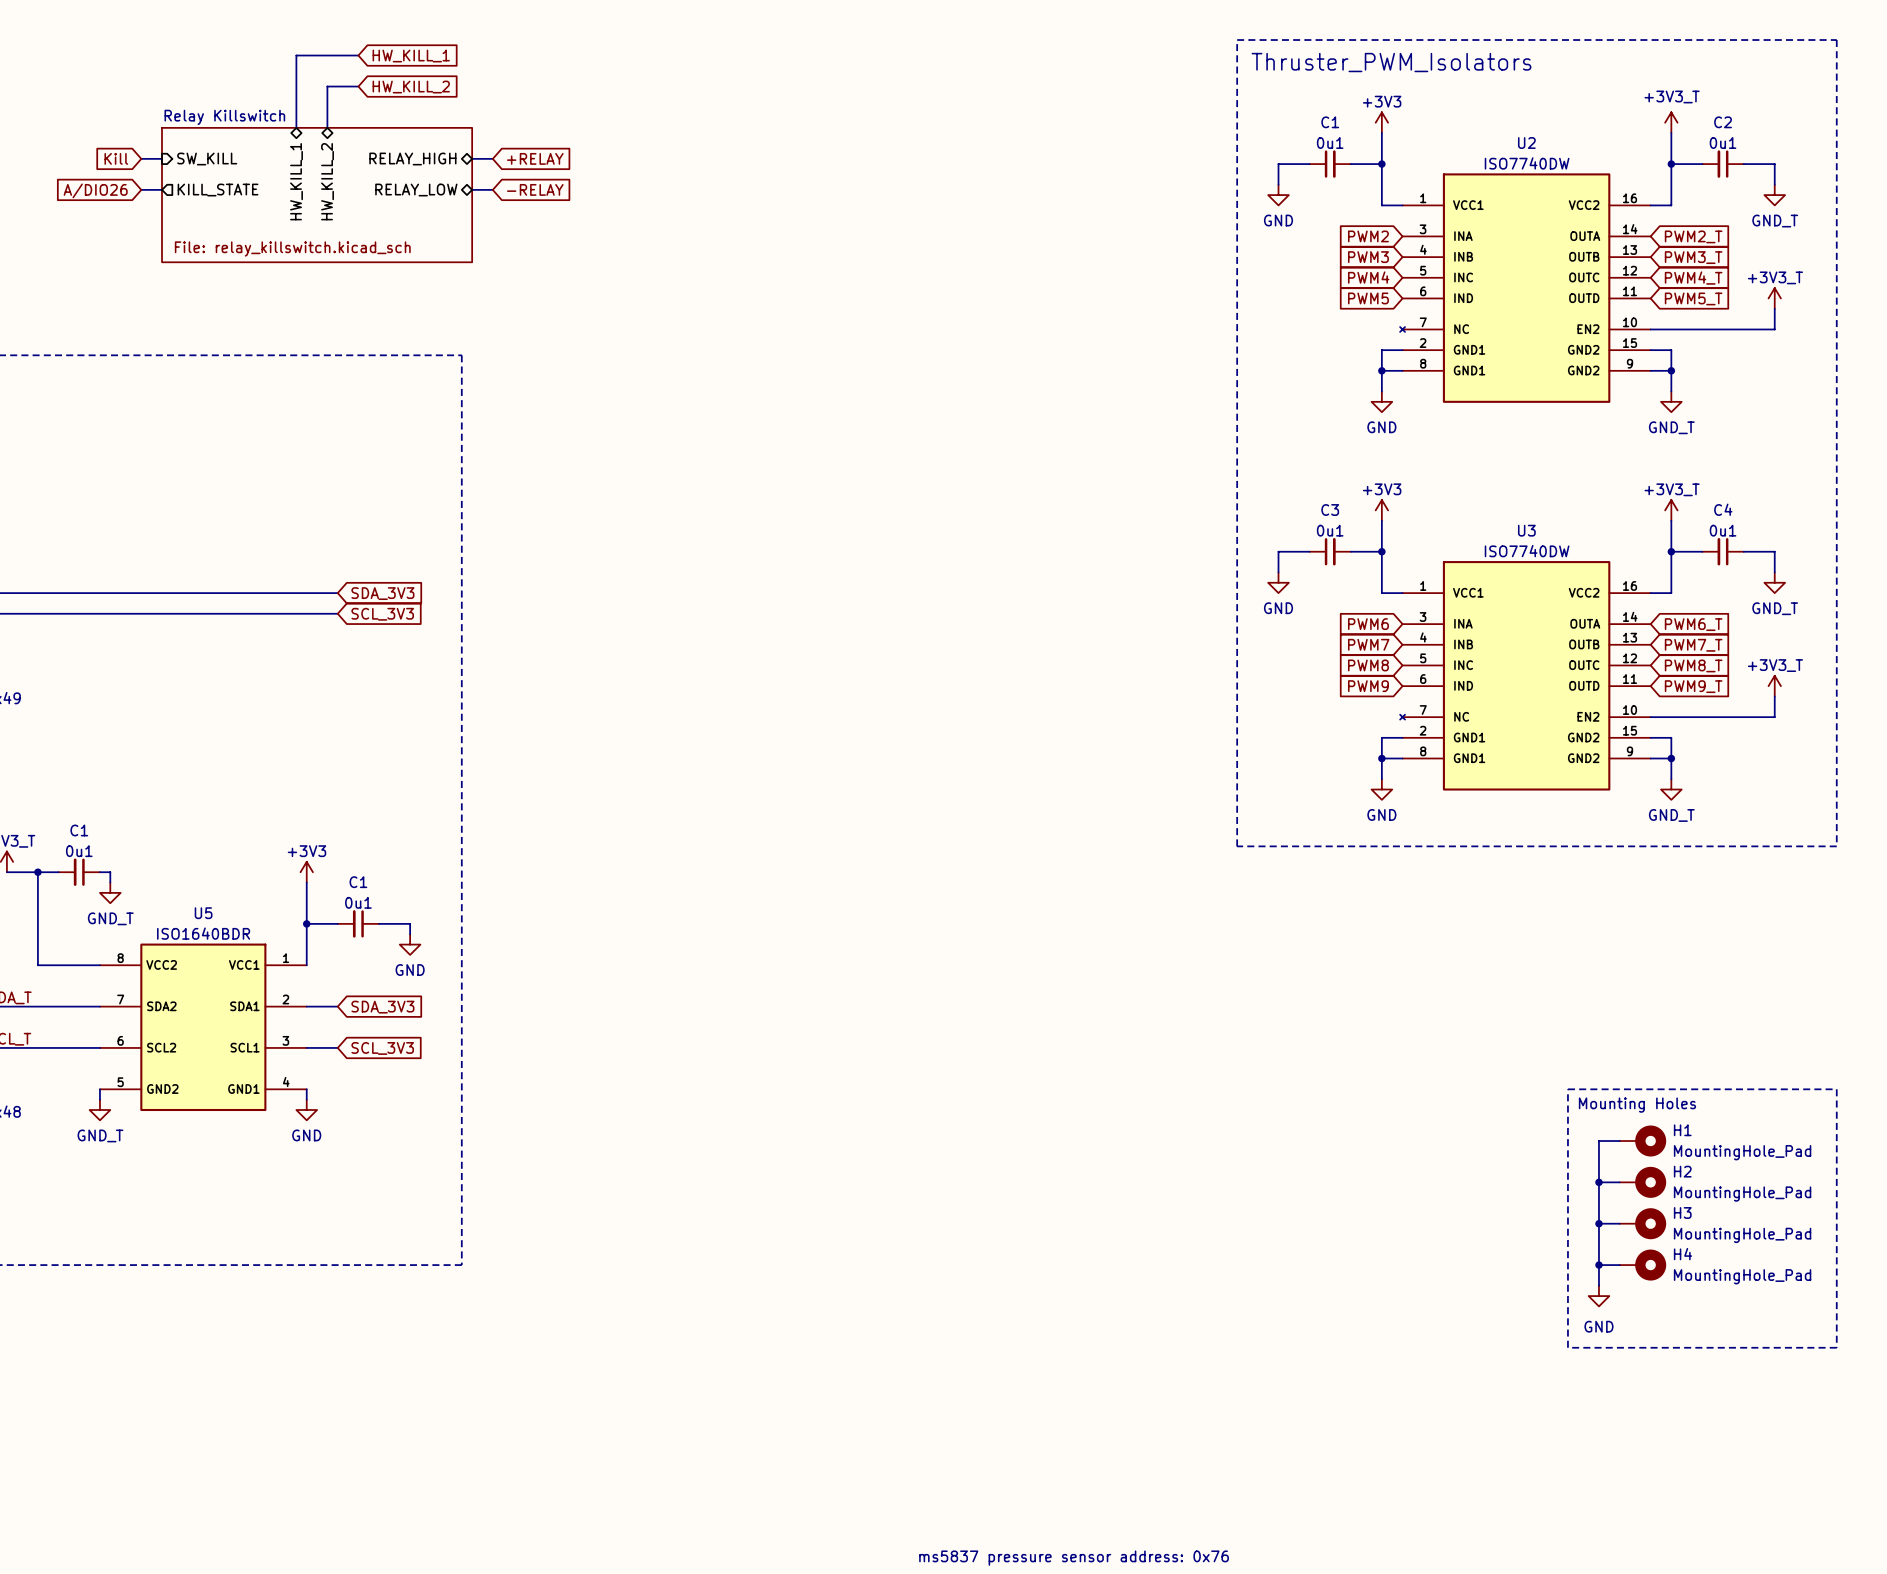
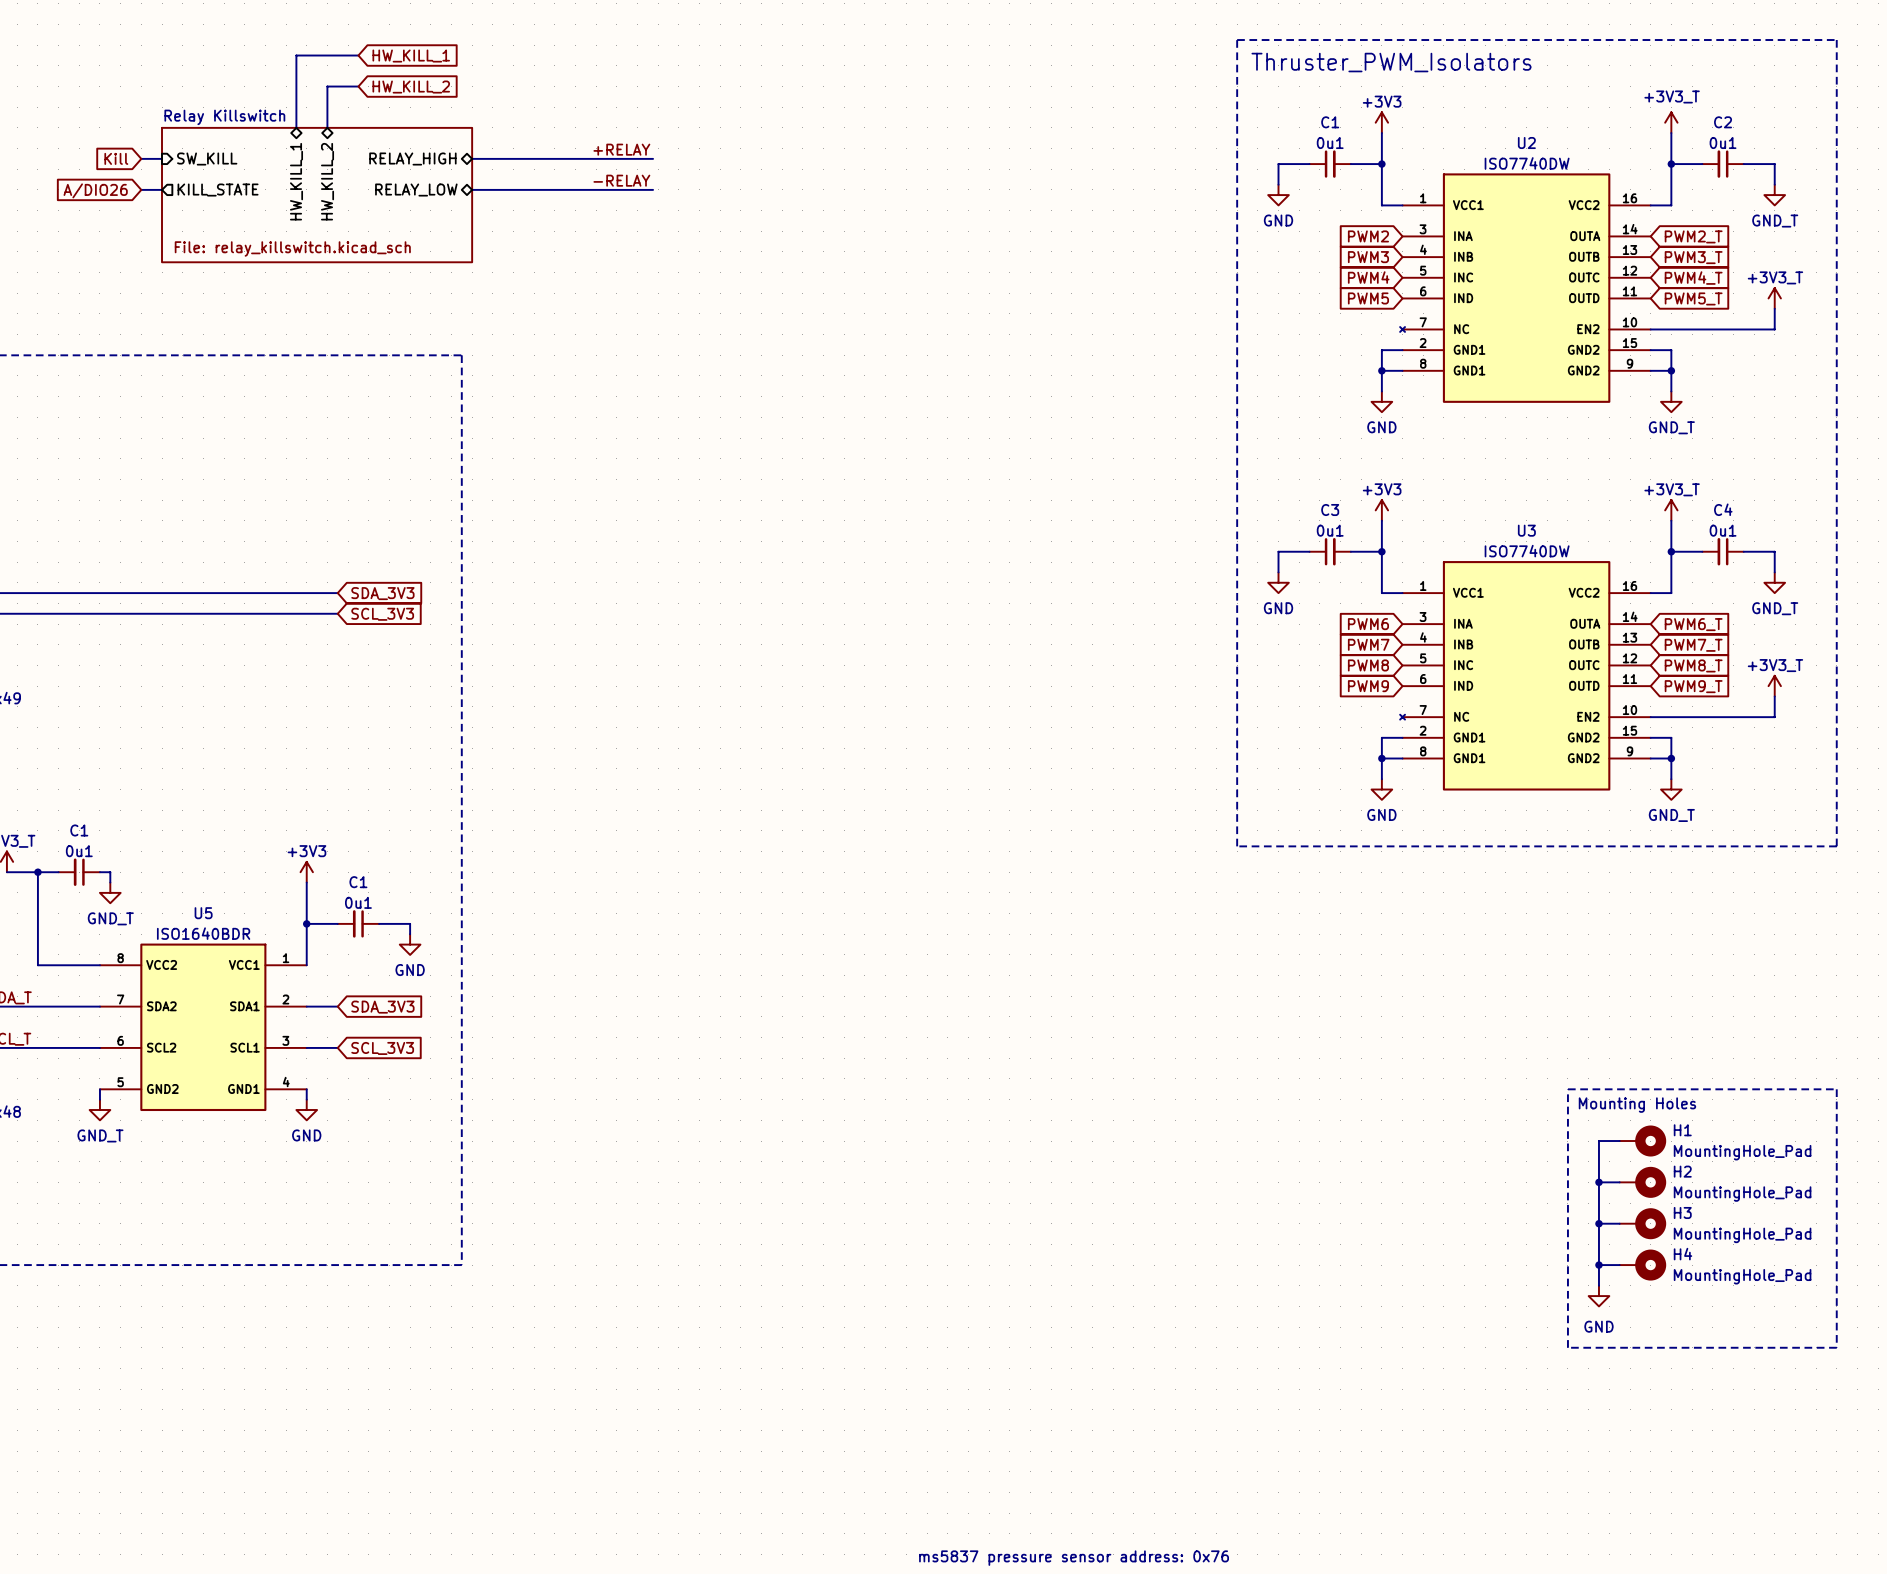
label: none -> +RELAY (621, 149)
wire: none -> (492, 158) (653, 158)
global label: +RELAY (535, 158) -> none
label: none -> -RELAY (621, 180)
wire: none -> (492, 189) (653, 189)
global label: -RELAY (535, 189) -> none

